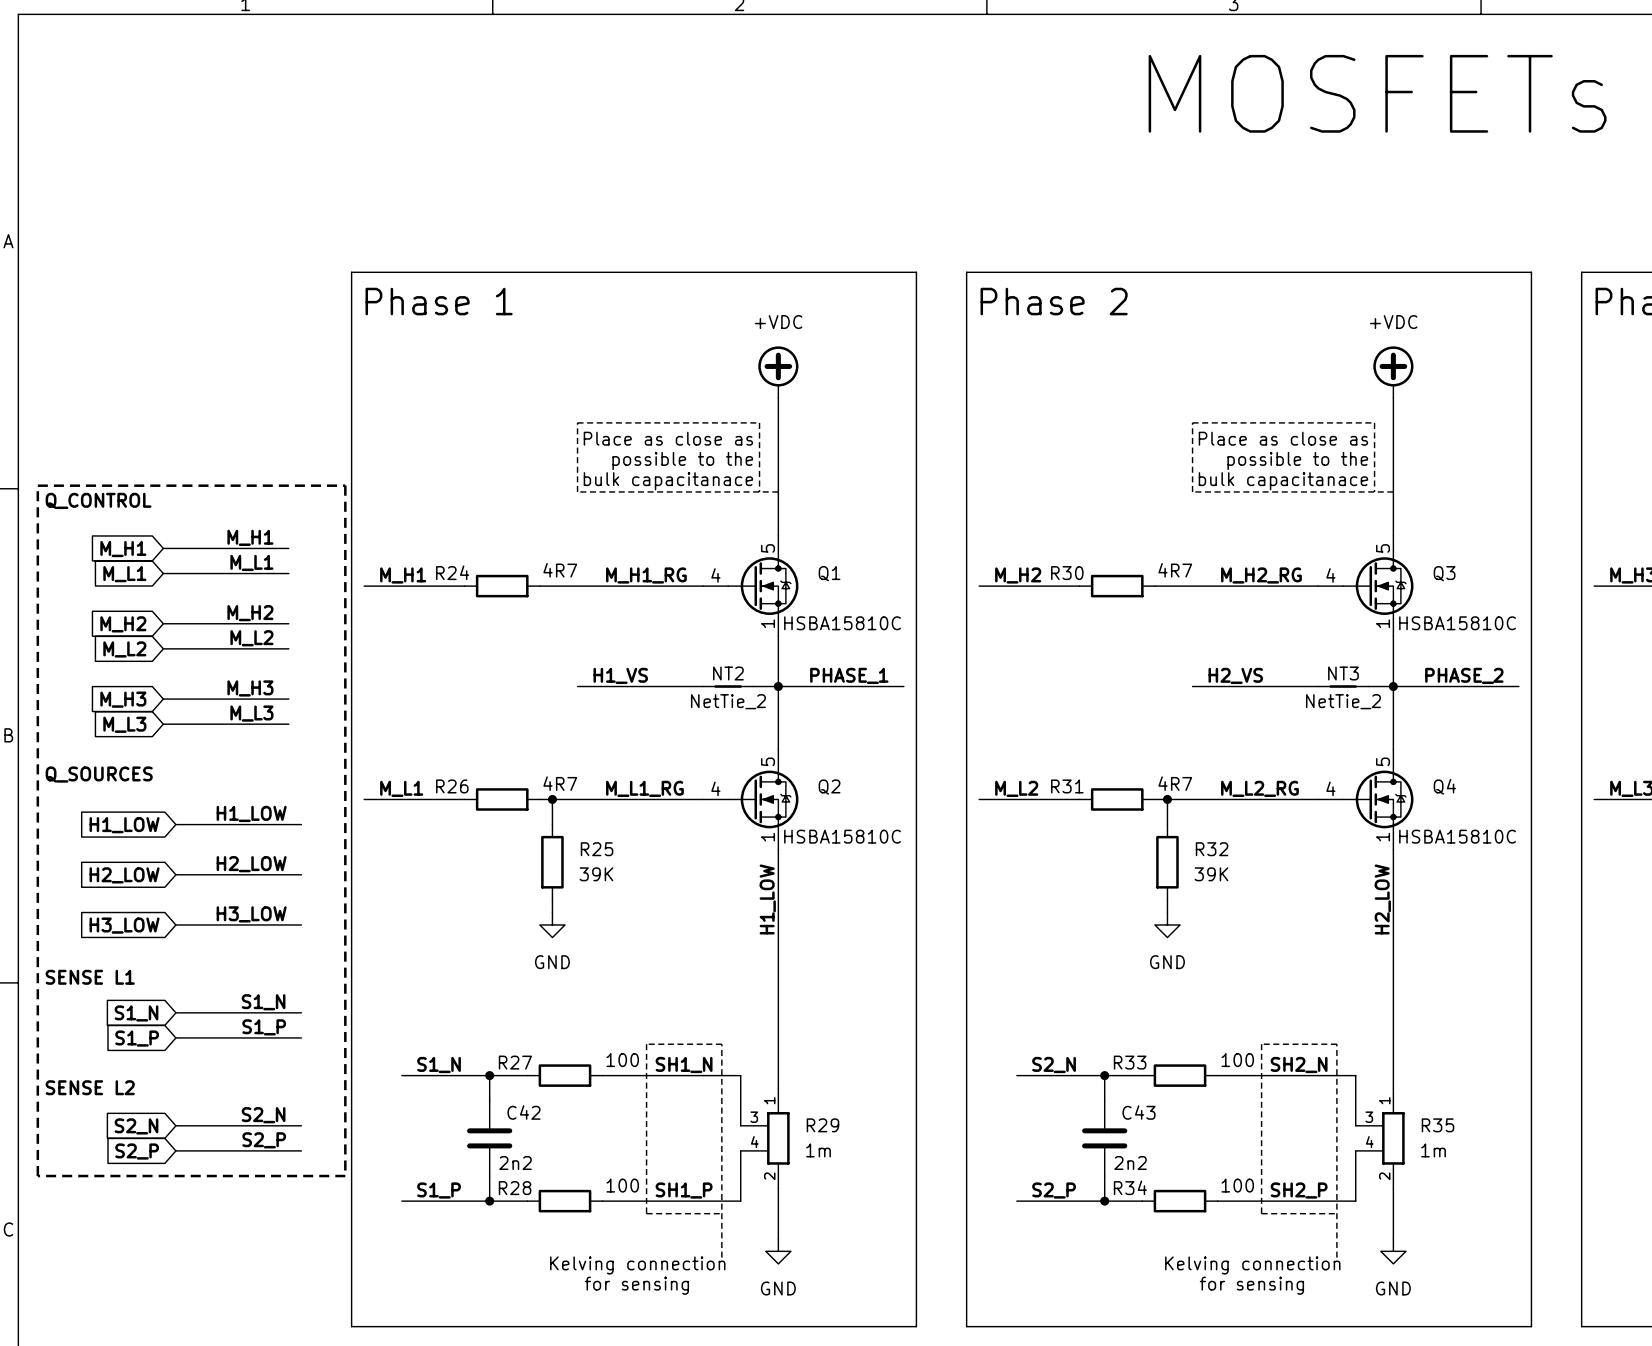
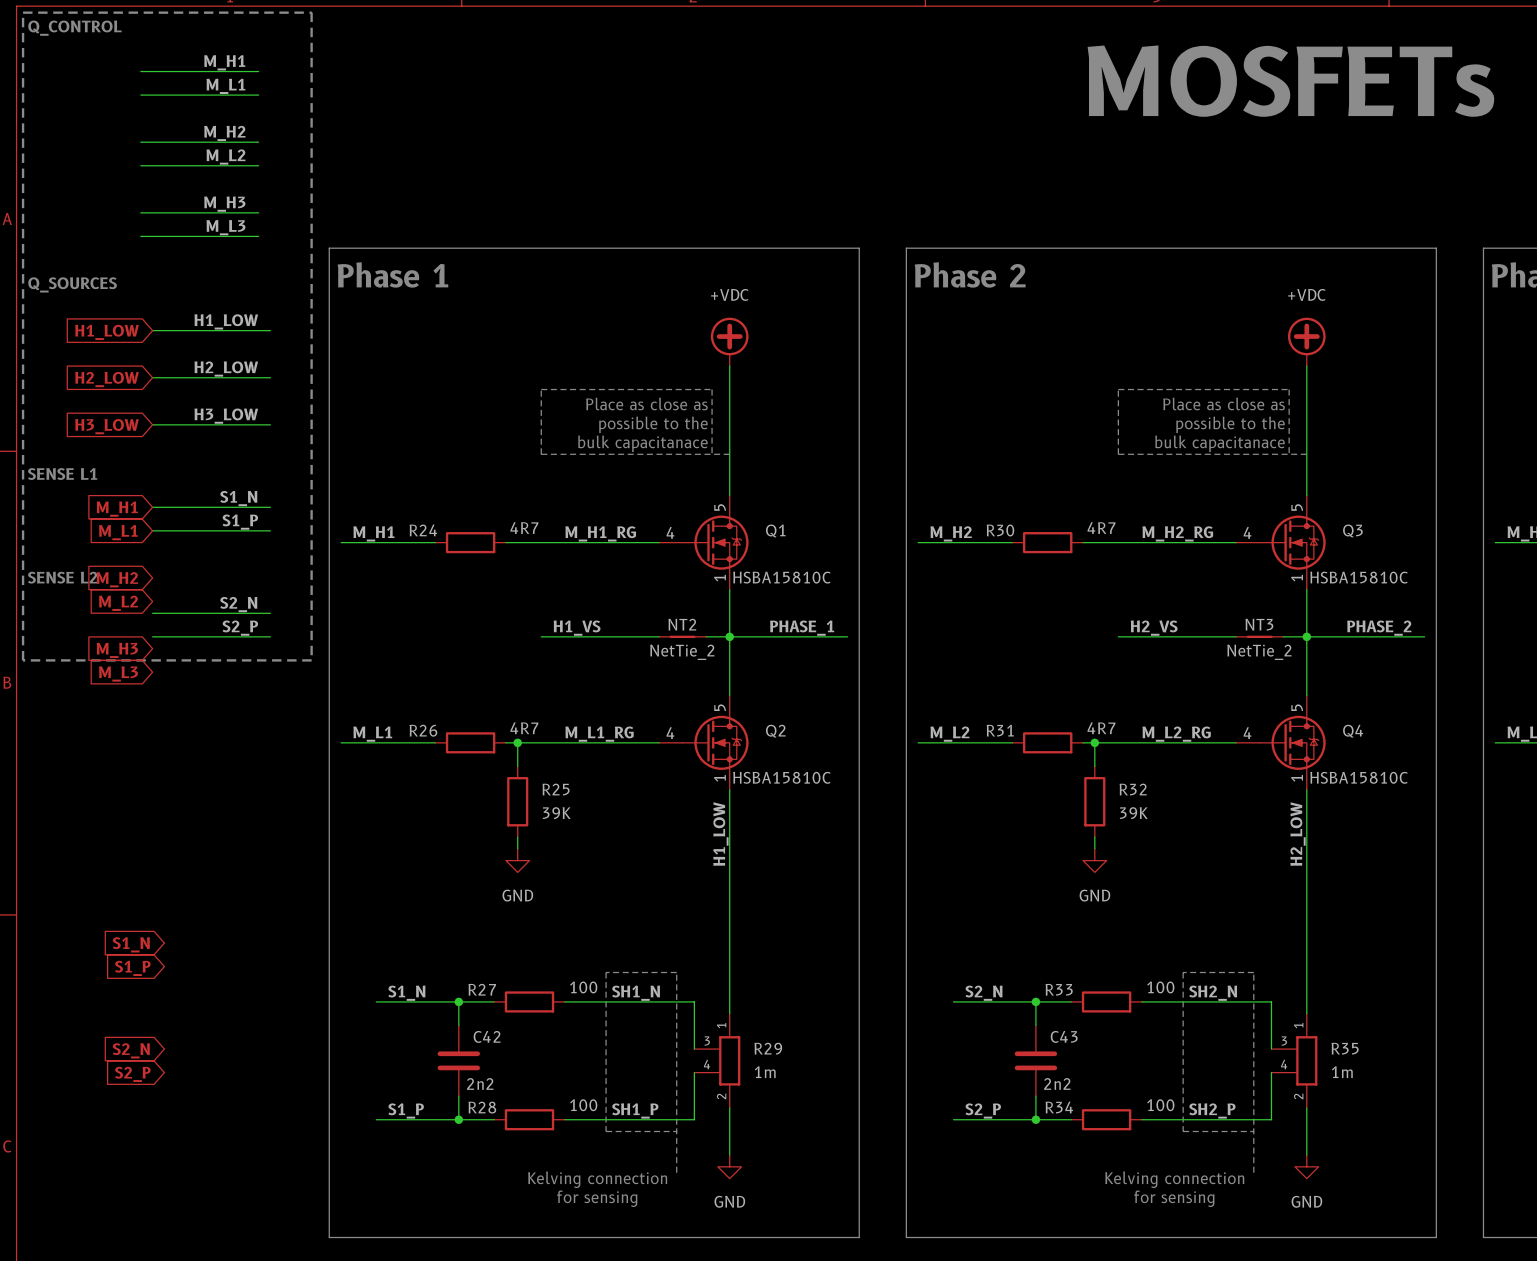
line: none -> (23, 12) (311, 12) (311, 660) (23, 660) (23, 12)
text: none -> Q_CONTROL (74, 28)
label: none -> M_H1 (224, 62)
wire: none -> (140, 71) (258, 71)
label: none -> M_L1 (225, 86)
wire: none -> (140, 95) (258, 95)
label: none -> M_H2 (224, 133)
wire: none -> (140, 142) (258, 142)
label: none -> M_L2 (225, 157)
wire: none -> (140, 165) (258, 165)
label: none -> M_H3 (224, 204)
wire: none -> (140, 212) (258, 212)
label: none -> M_L3 (225, 227)
wire: none -> (140, 236) (258, 236)
text: none -> Q_SOURCES (72, 284)
label: none -> H1_LOW (226, 321)
global label: none -> H1_LOW (107, 332)
wire: none -> (152, 330) (270, 330)
label: none -> H2_LOW (226, 368)
global label: none -> H2_LOW (107, 379)
label: none -> H3_LOW (226, 416)
global label: none -> H3_LOW (107, 426)
line: (37, 485) (345, 485) (345, 1176) (37, 1176) (37, 485) -> none
text: Q_CONTROL (98, 500) -> none
text: none -> SENSE L1 (62, 473)
label: M_H1 (250, 537) -> S1_N (238, 498)
label: M_L1 (251, 562) -> S1_P (240, 522)
label: M_H2 (250, 613) -> none
text: none -> SENSE L2 (62, 577)
wire: (163, 623) (288, 623) -> (152, 613) (270, 613)
label: M_L2 (251, 638) -> none
wire: (163, 648) (288, 648) -> (152, 377) (270, 377)
label: none -> S2_N (238, 604)
label: none -> S2_P (240, 628)
label: M_H3 (250, 688) -> none
wire: (163, 699) (288, 699) -> (152, 424) (270, 424)
label: M_L3 (251, 713) -> none
wire: (163, 724) (288, 724) -> (152, 636) (270, 636)
text: Q_SOURCES (99, 774) -> none
label: H1_LOW (251, 813) -> none
wire: (175, 824) (301, 824) -> none
global label: H1_LOW (124, 825) -> none
label: H2_LOW (251, 864) -> none
wire: (175, 874) (301, 874) -> none
global label: H2_LOW (124, 875) -> none
label: H3_LOW (251, 914) -> none
wire: (175, 924) (301, 924) -> none
global label: H3_LOW (124, 925) -> none
text: SENSE L1 (90, 977) -> none
label: S1_N (263, 1002) -> none
wire: (175, 1012) (301, 1012) -> none
label: S1_P (264, 1027) -> none
wire: (175, 1037) (301, 1037) -> none
text: SENSE L2 (90, 1087) -> none
label: S2_N (263, 1115) -> none
wire: (175, 1125) (301, 1125) -> none
label: S2_P (264, 1140) -> none
wire: (175, 1150) (301, 1150) -> none

